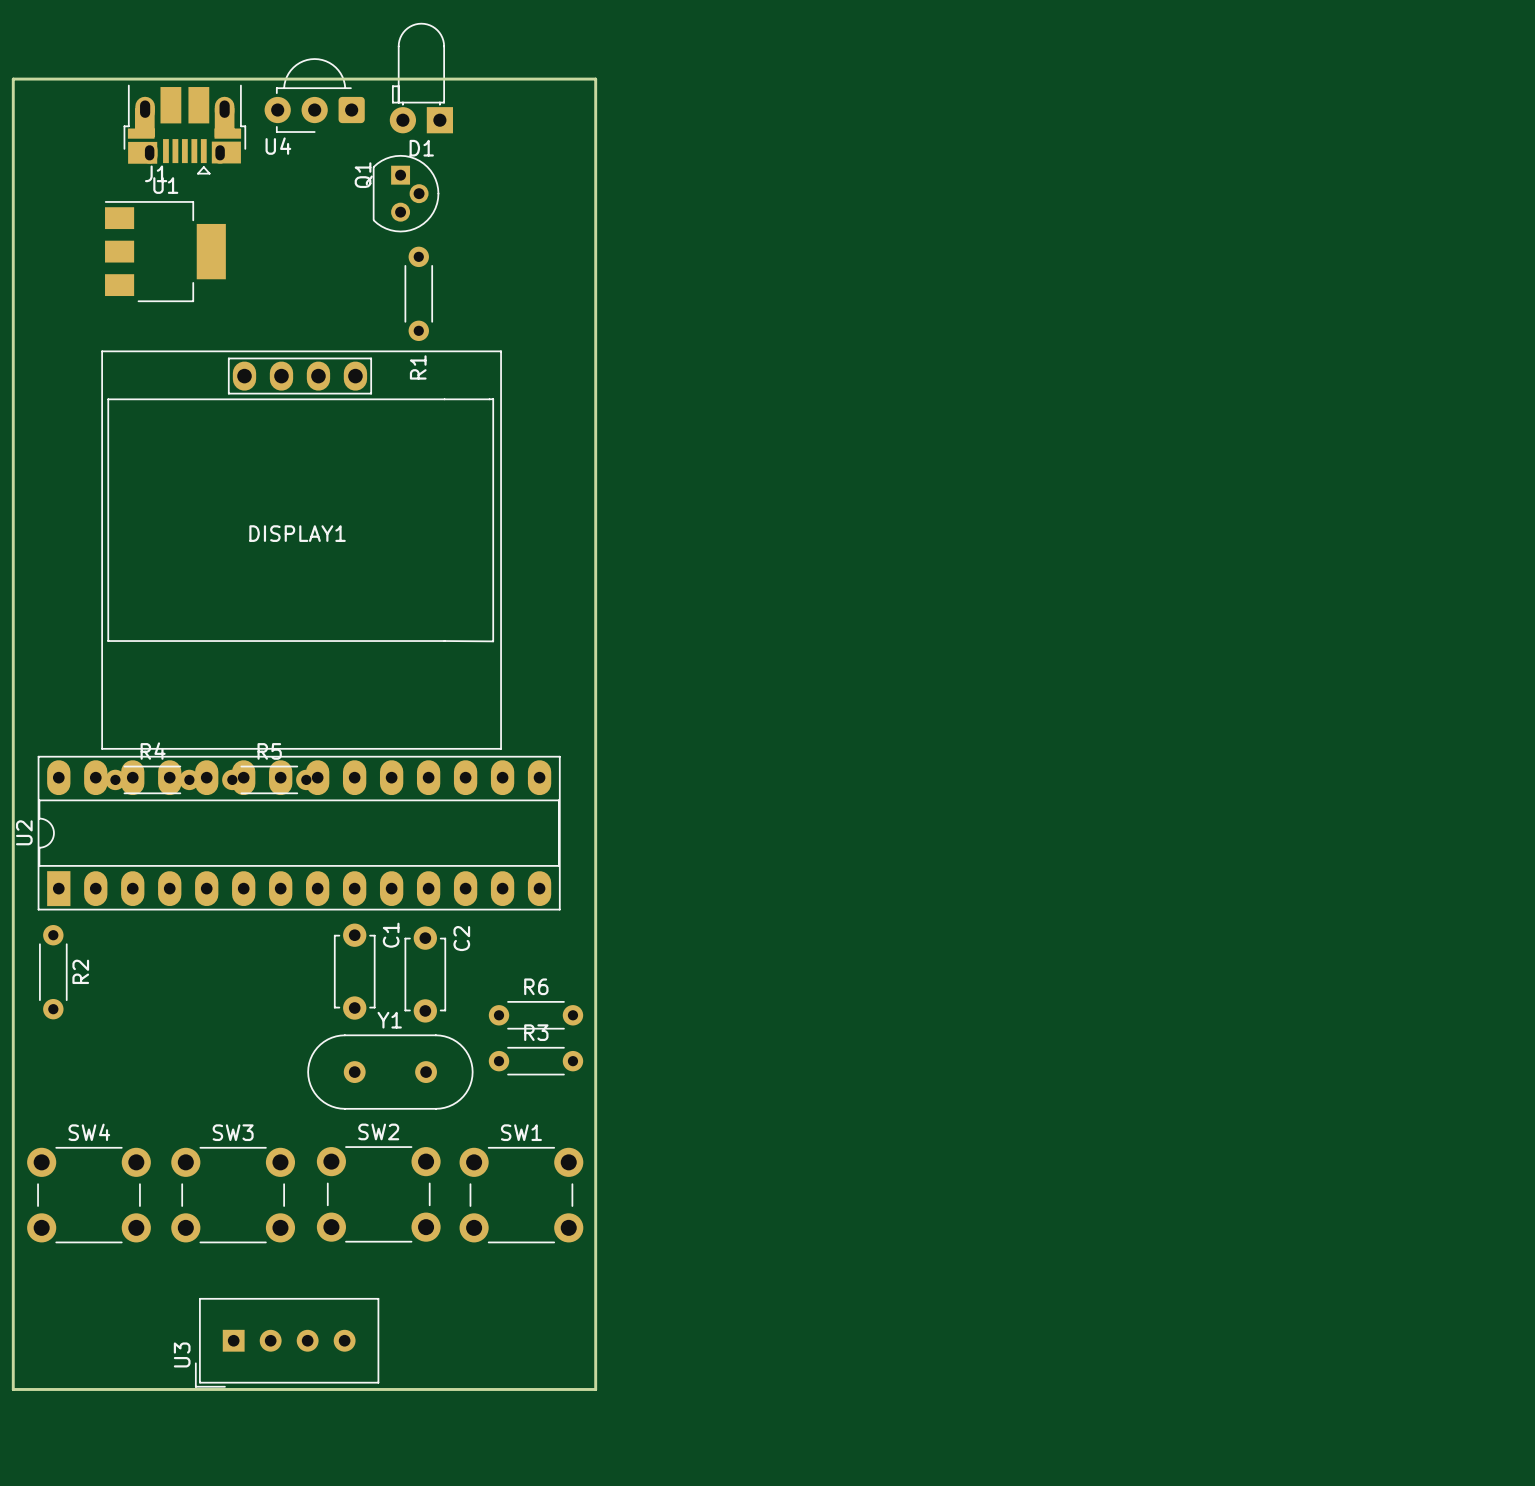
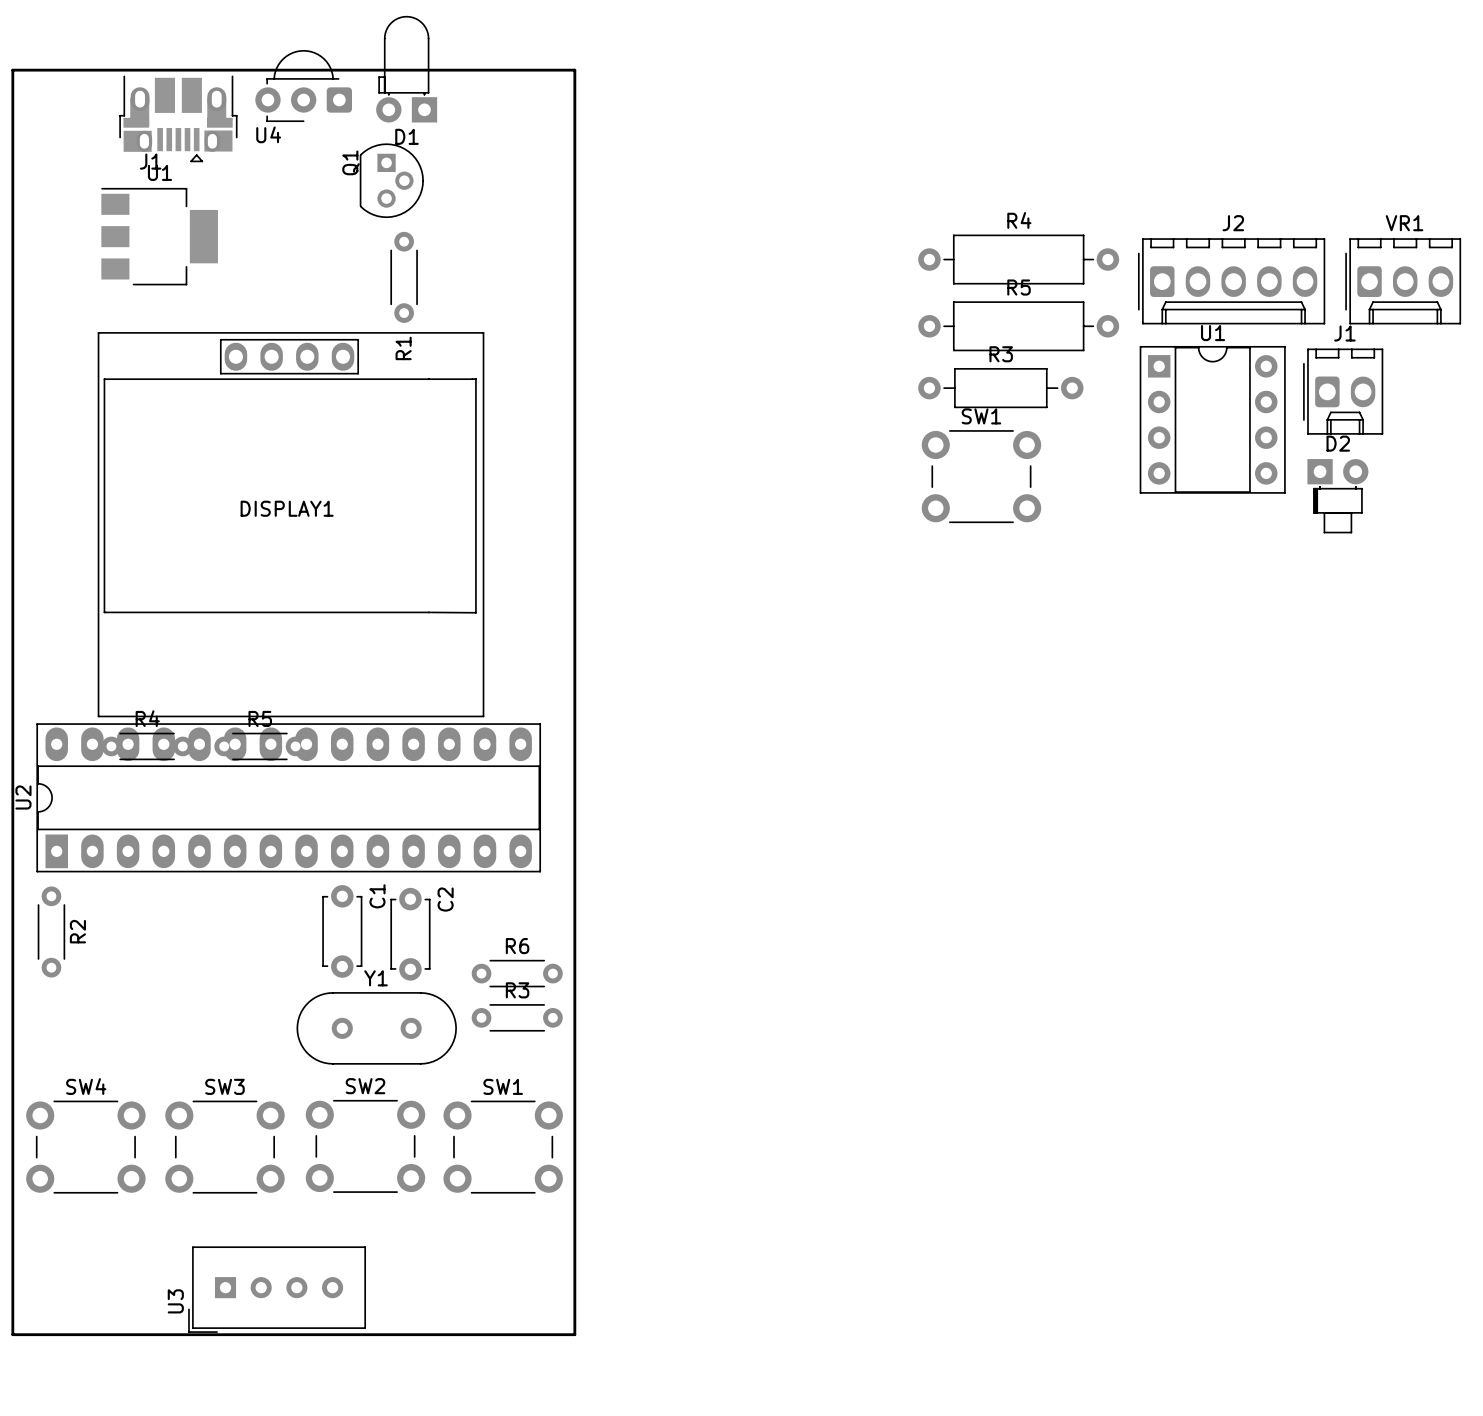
R4: none -> (1018, 259)
J2: none -> (1231, 281)
VR1: none -> (1403, 281)
R5: none -> (1018, 326)
R3: none -> (1000, 388)
J1: none -> (1343, 391)
U1: none -> (1212, 419)
SW1: none -> (981, 476)
D2: none -> (1337, 496)

